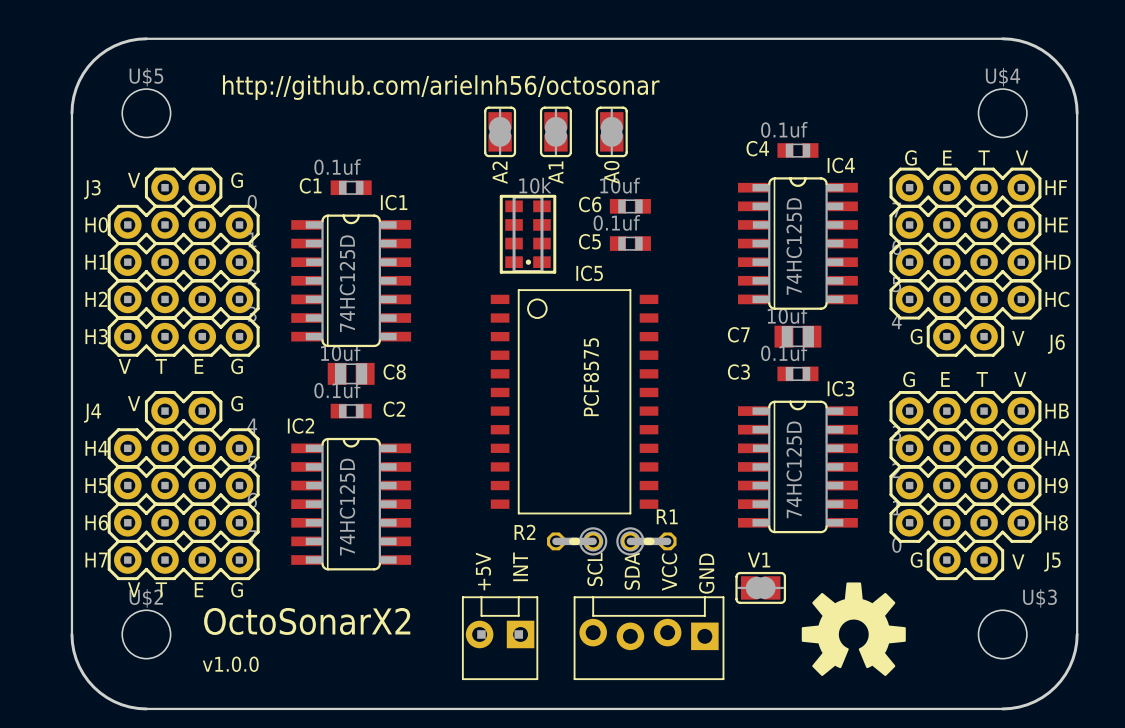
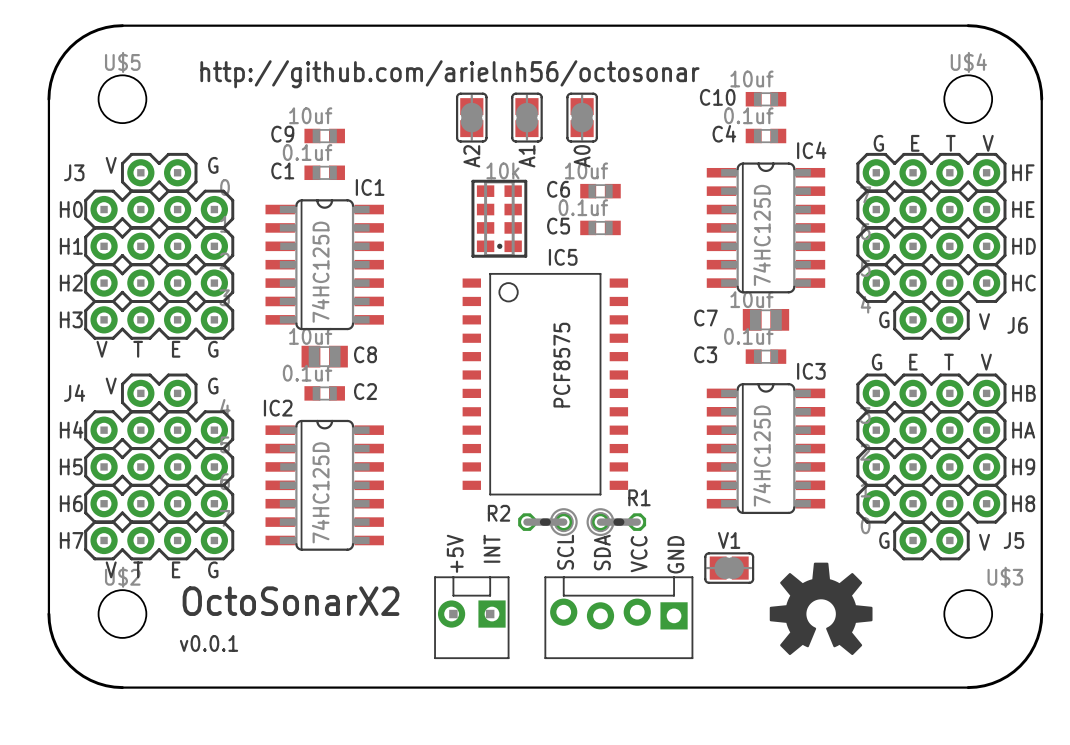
C10: none -> 10uf (765, 99)
C9: none -> 10uf (324, 135)
text: v1.0.0 (230, 664) -> v0.0.1 (209, 643)

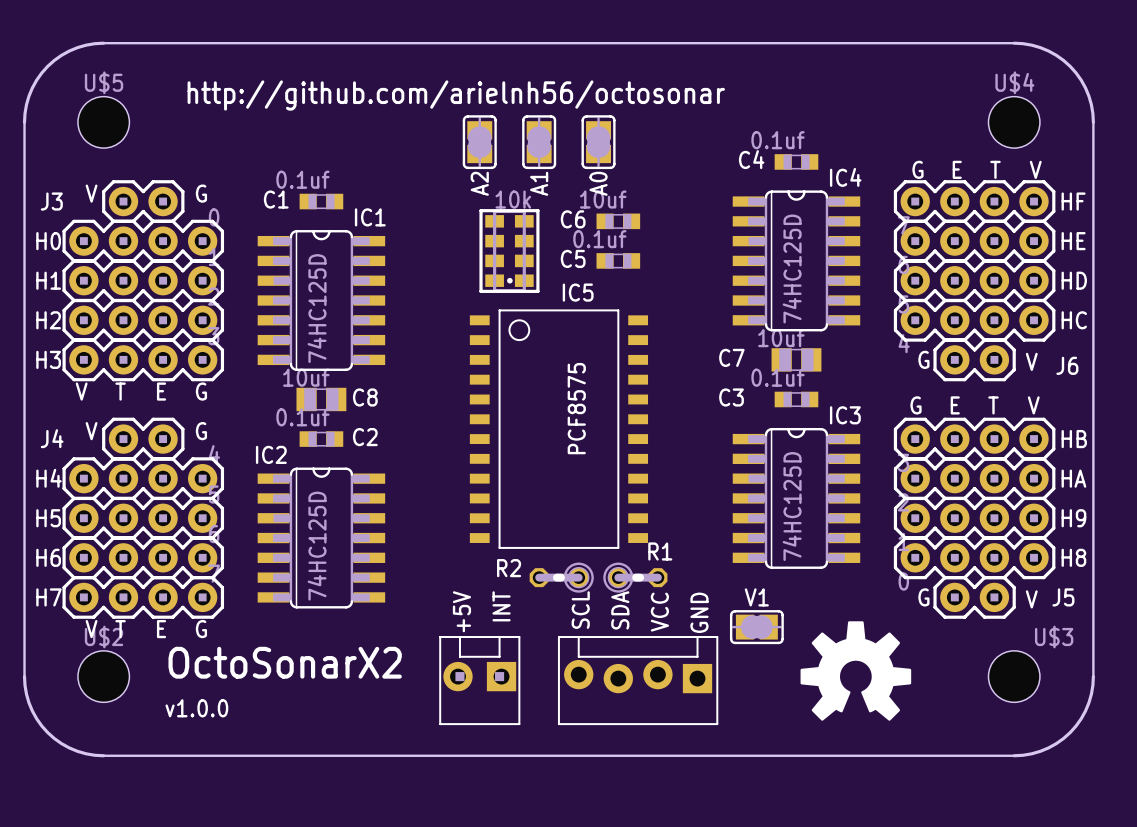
C10: 10uf (765, 99) -> none
C9: 10uf (324, 135) -> none
text: v0.0.1 (209, 643) -> v1.0.0 (196, 708)

